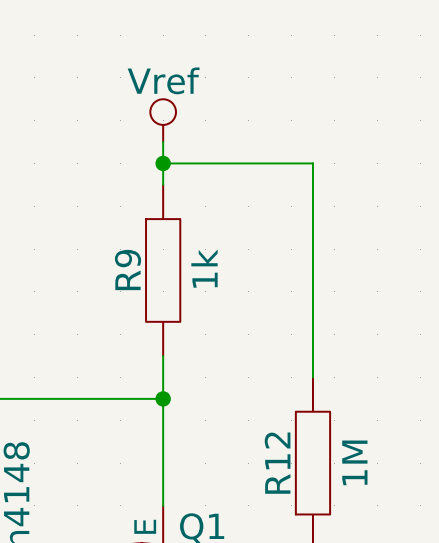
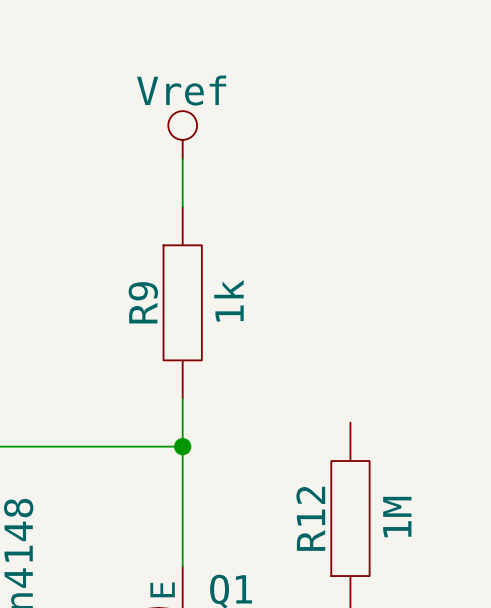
wire: (163, 163) (312, 163) (312, 377) -> none
junction: (163, 163) -> none

